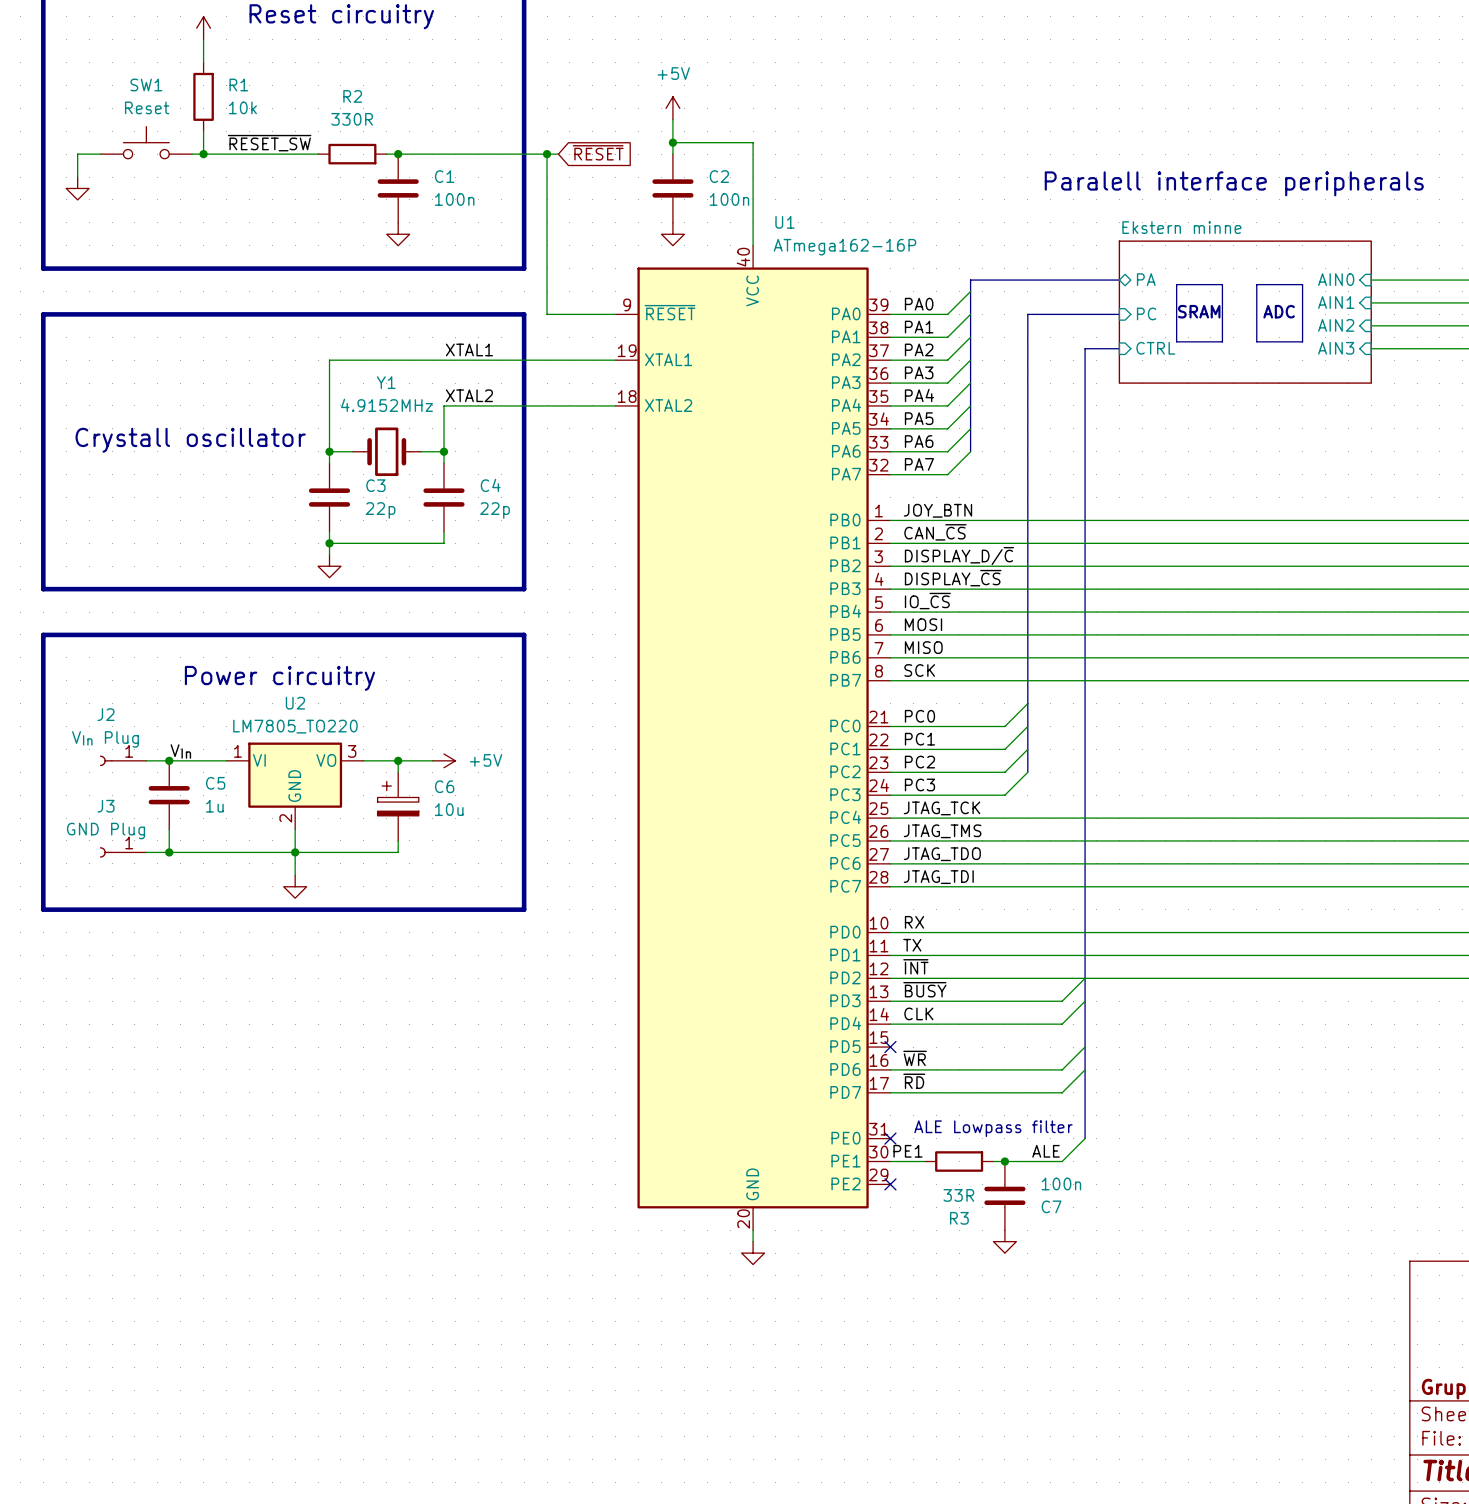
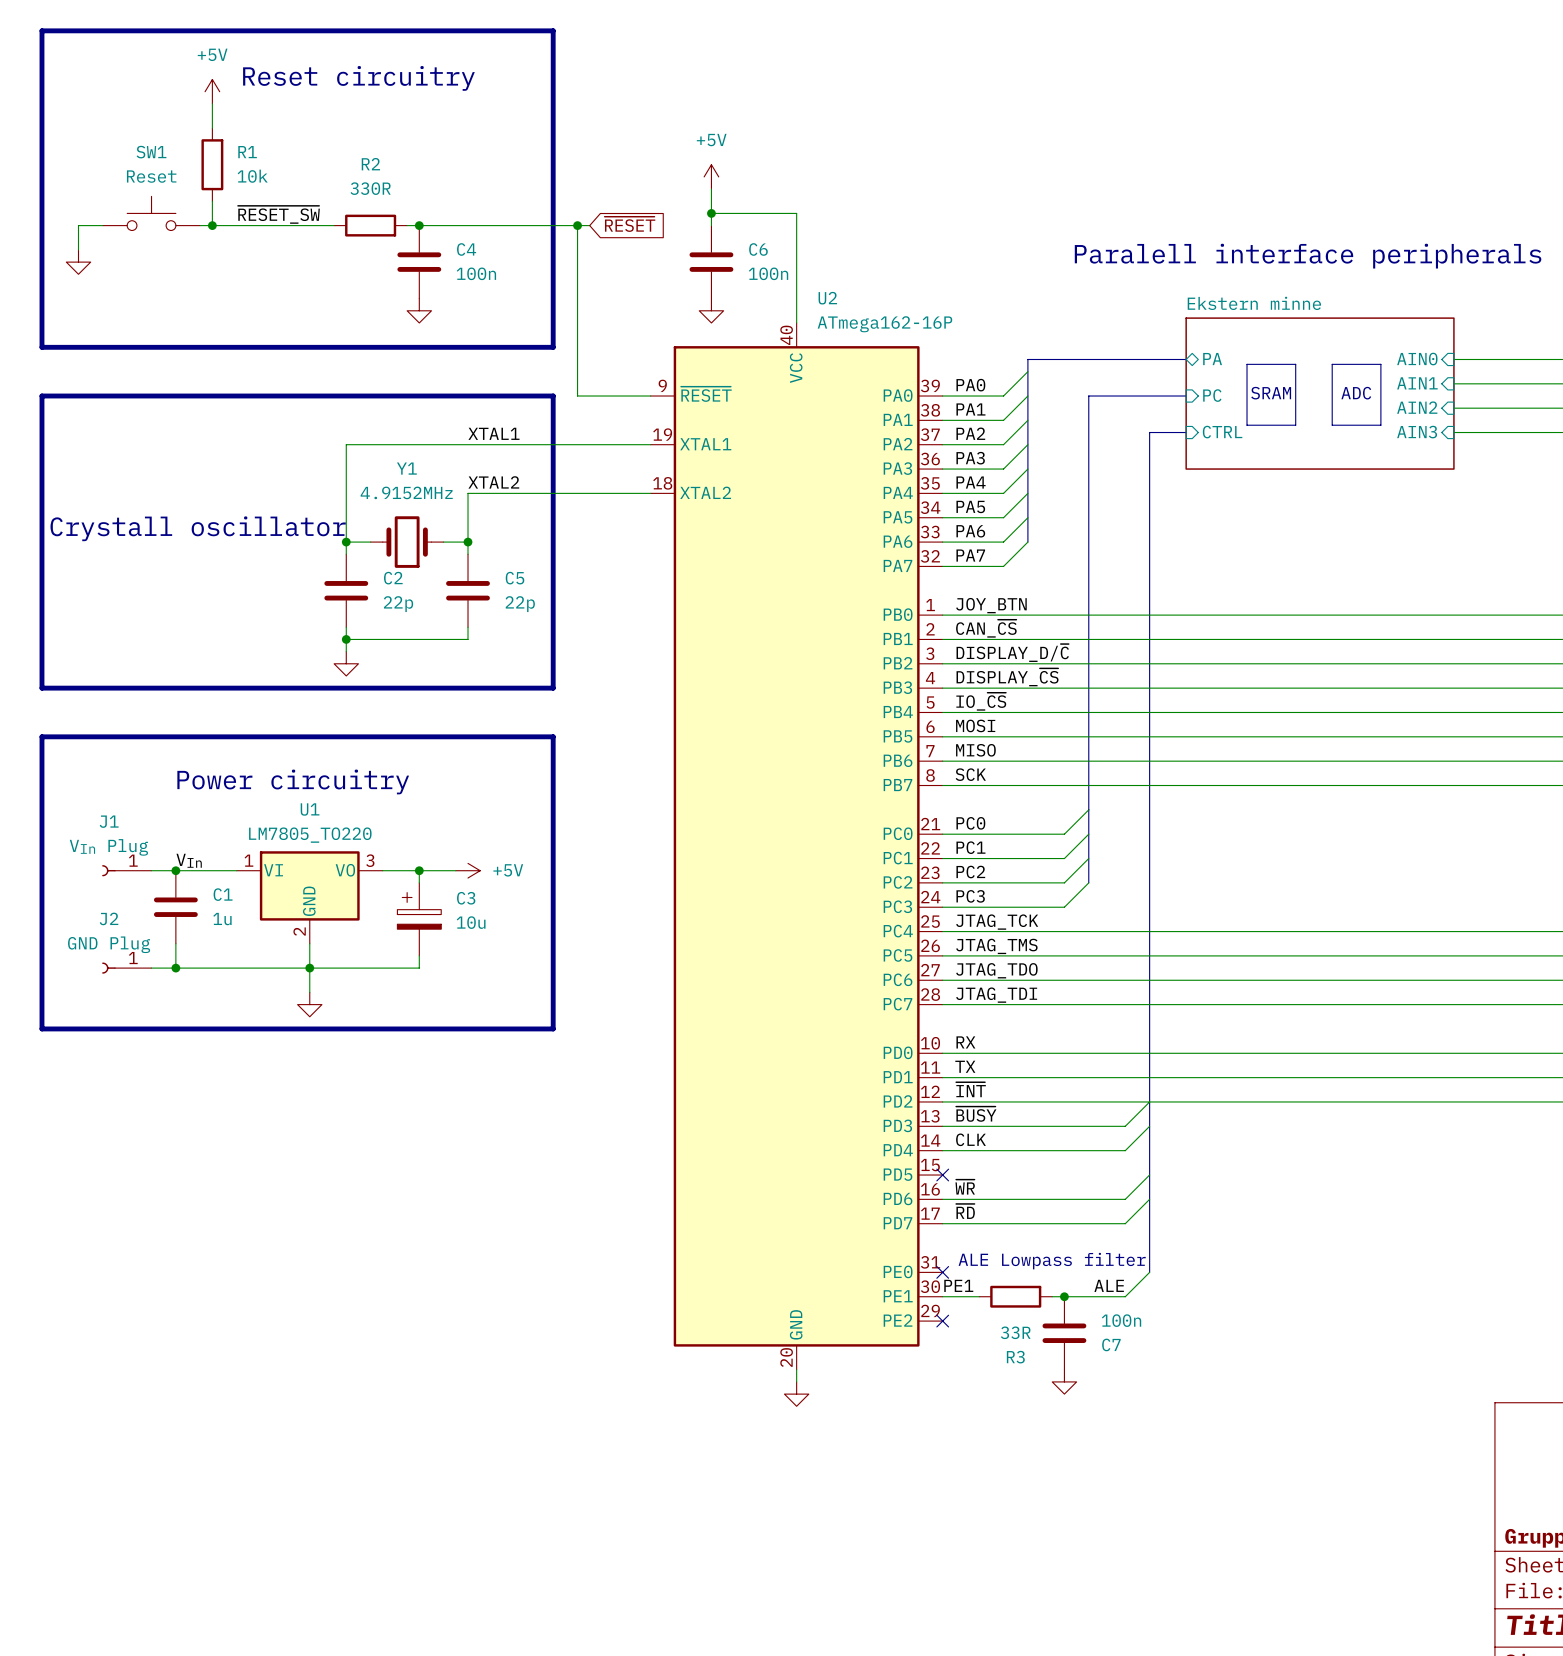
C1 name: C1 (444, 176) -> C4 (466, 249)
C2 name: C2 (719, 176) -> C6 (758, 249)
U1 name: U1 (785, 222) -> U2 (827, 298)
C3 name: C3 (375, 485) -> C2 (393, 578)
C4 name: C4 (490, 485) -> C5 (515, 578)
U2 name: U2 (295, 703) -> U1 (310, 809)
J2 name: J2 (106, 714) -> J1 (109, 821)
C5 name: C5 (215, 783) -> C1 (223, 894)
C6 name: C6 (444, 786) -> C3 (466, 898)
J3 name: J3 (106, 806) -> J2 (109, 918)

